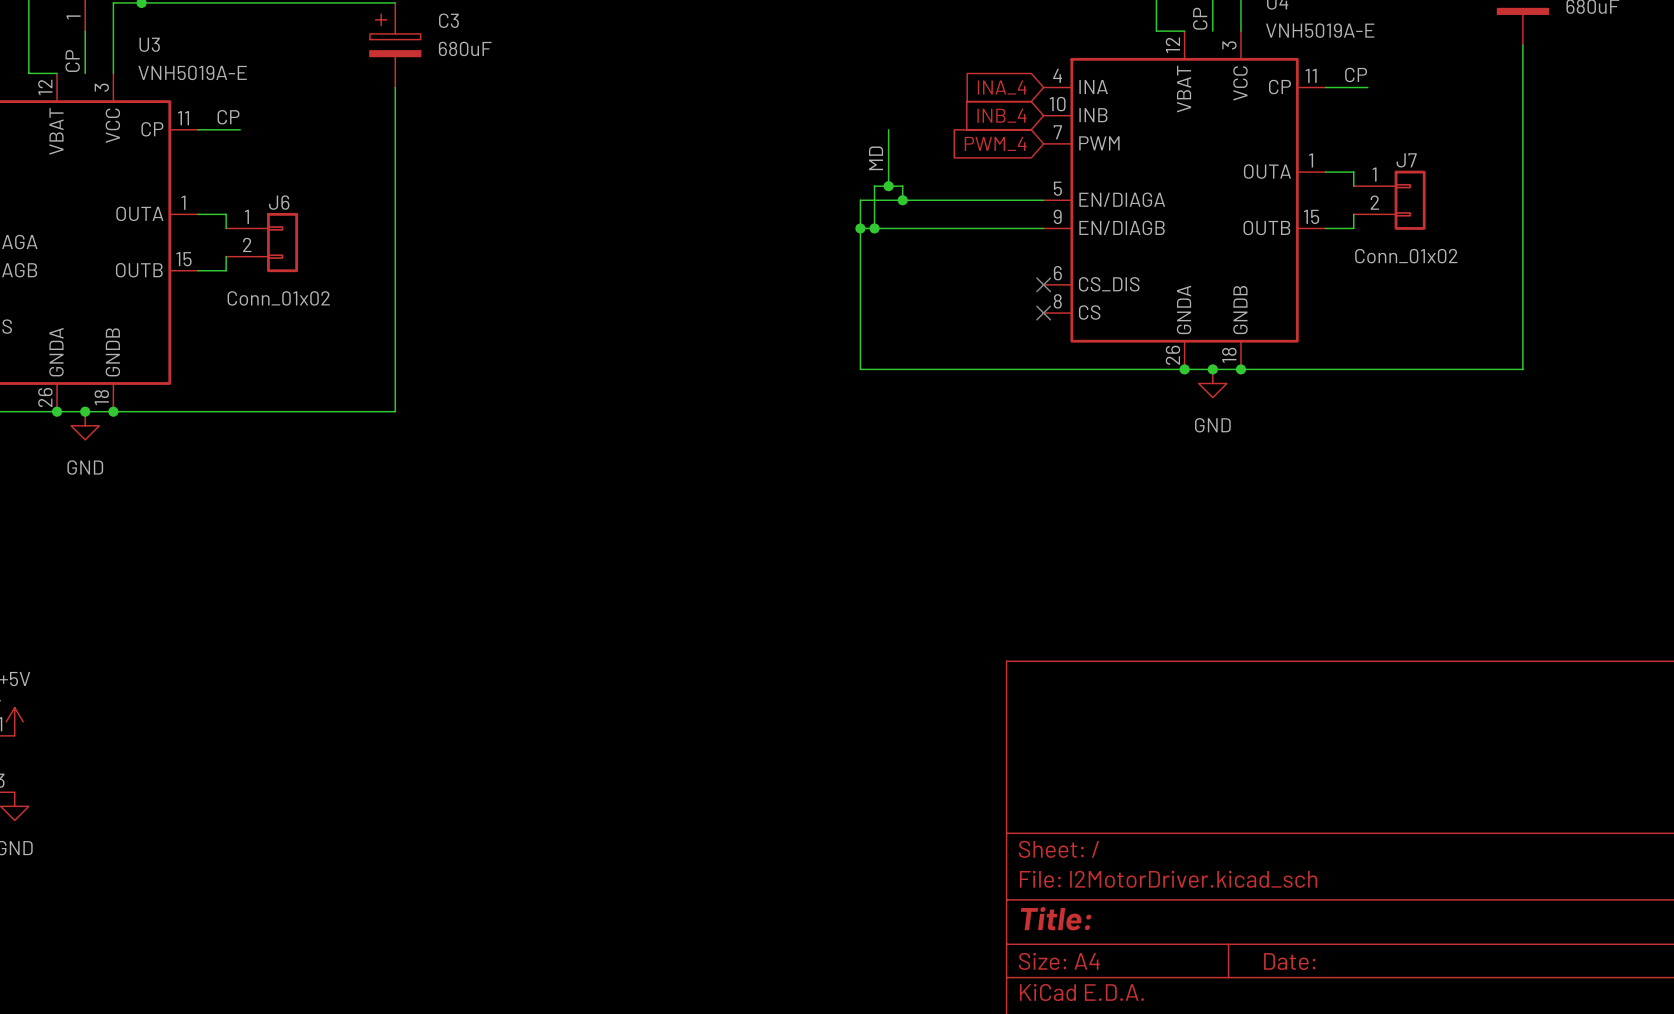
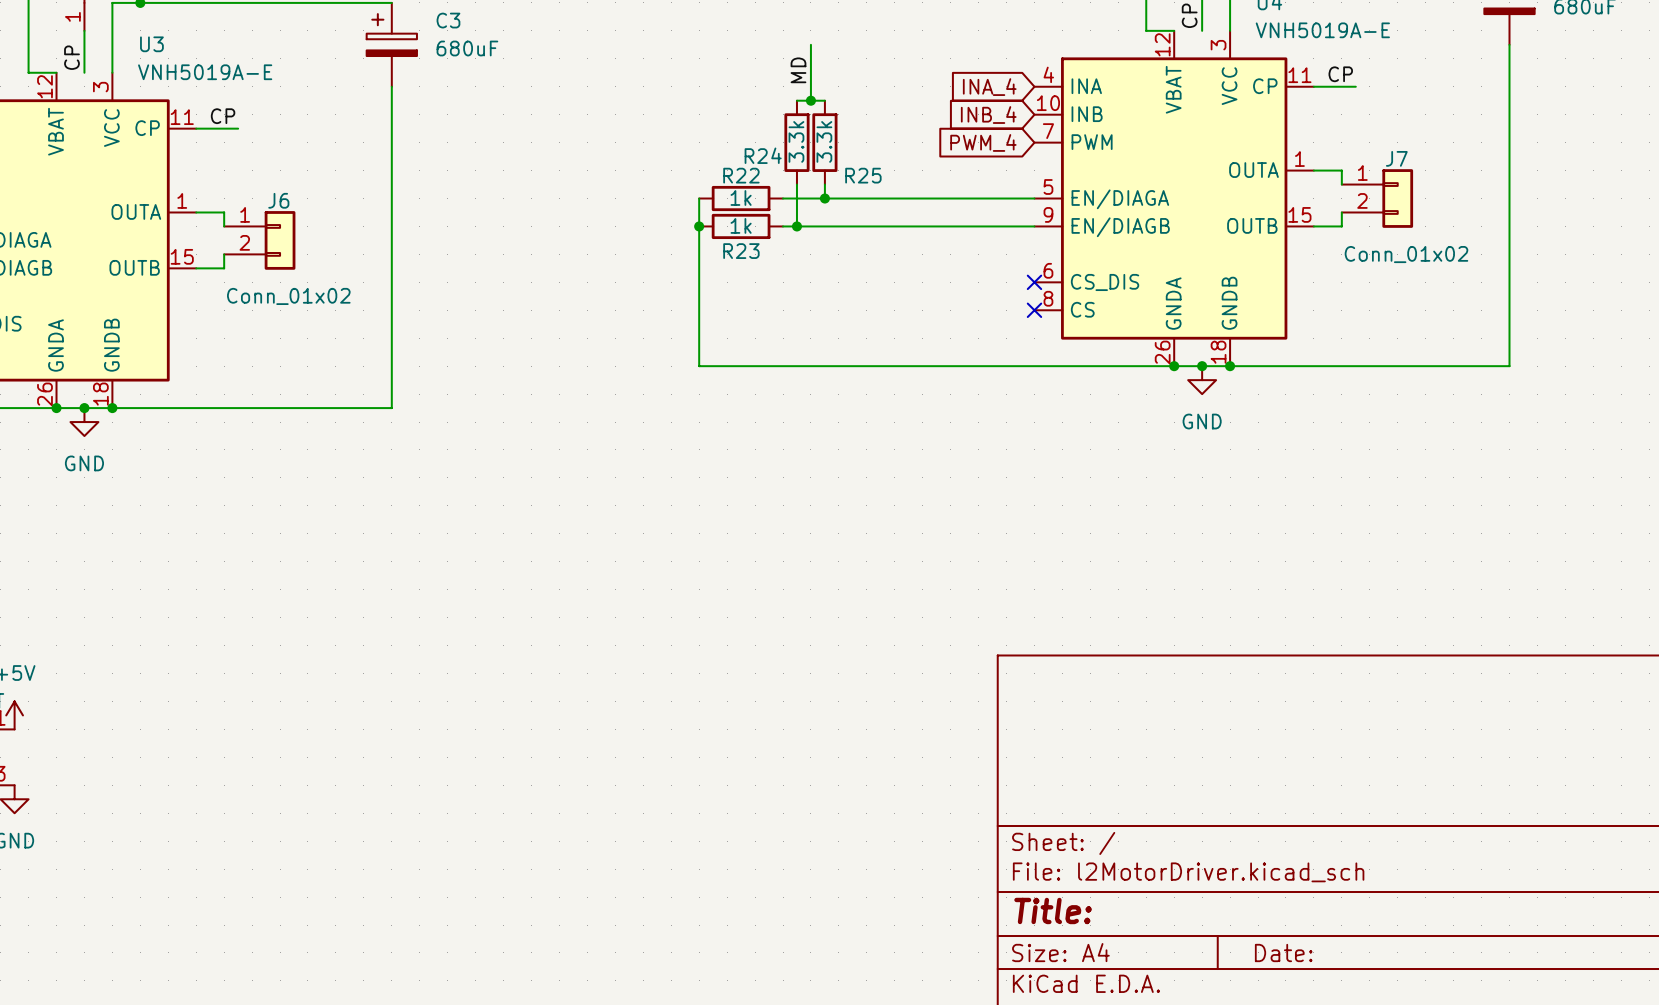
wire: none -> (796, 100) (824, 100)
junction: none -> (810, 100)
wire: (888, 129) (888, 186) -> (810, 44) (810, 100)
R24: none -> 3.3k (796, 142)
R25: none -> 3.3k (824, 142)
label position: MD (876, 158) -> MD (798, 70)
wire: none -> (796, 184) (796, 226)
wire: none -> (824, 184) (824, 198)
junction: (888, 186) -> none
R22: none -> 1k (741, 198)
wire: none -> (783, 198) (852, 198)
junction: none -> (824, 198)
wire: (860, 200) (860, 369) -> (699, 198) (699, 366) (852, 366)
wire: (902, 200) (902, 186) (874, 186) (874, 228) -> none
junction: (902, 200) -> none
junction: none -> (699, 226)
R23: none -> 1k (741, 226)
wire: none -> (783, 226) (852, 226)
junction: none -> (796, 226)
junction: (860, 228) -> none
junction: (874, 228) -> none

